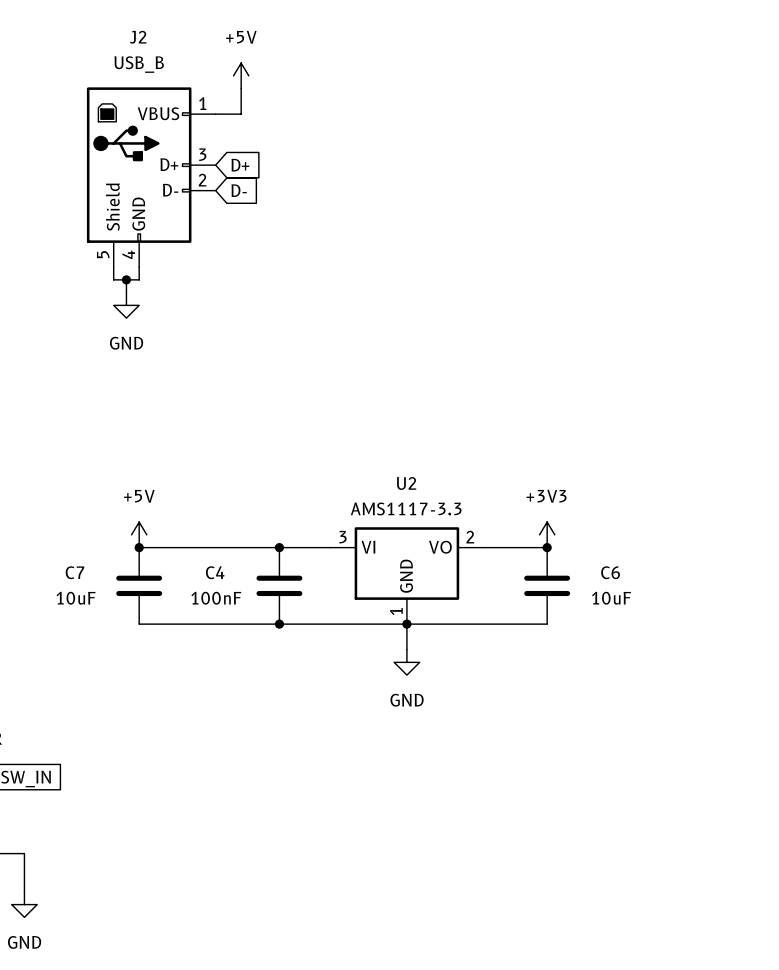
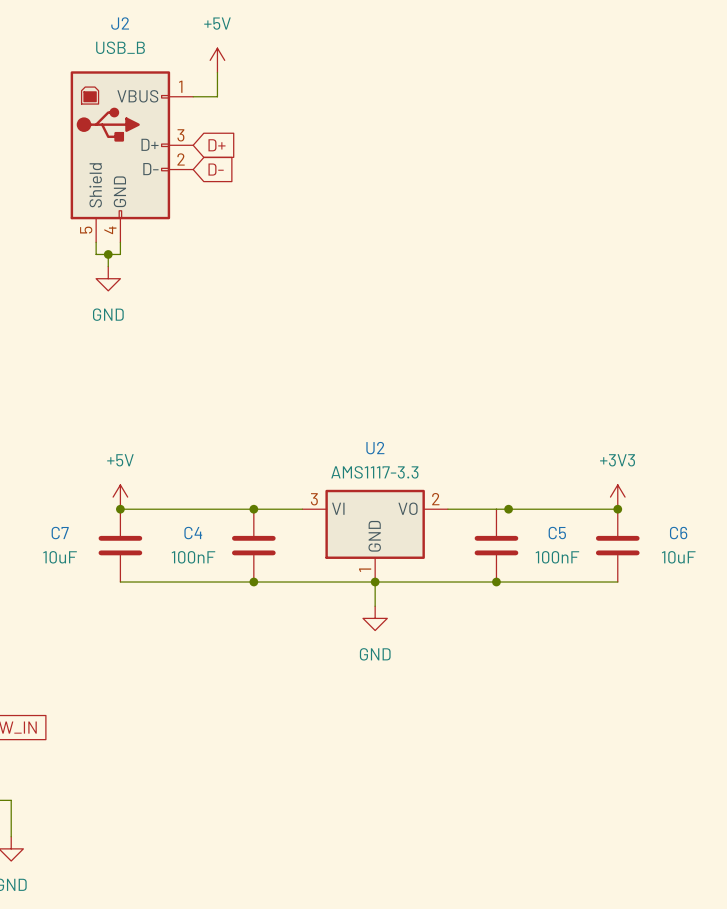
power symbol position: +3V3 (547, 534) -> +3V3 (617, 497)
wire: none -> (508, 509) (617, 509)
junction: none -> (617, 509)
C5: none -> 100nF (496, 545)
C6 position: (547, 585) -> (617, 545)
junction: none -> (496, 582)
wire: none -> (508, 582) (617, 582)

